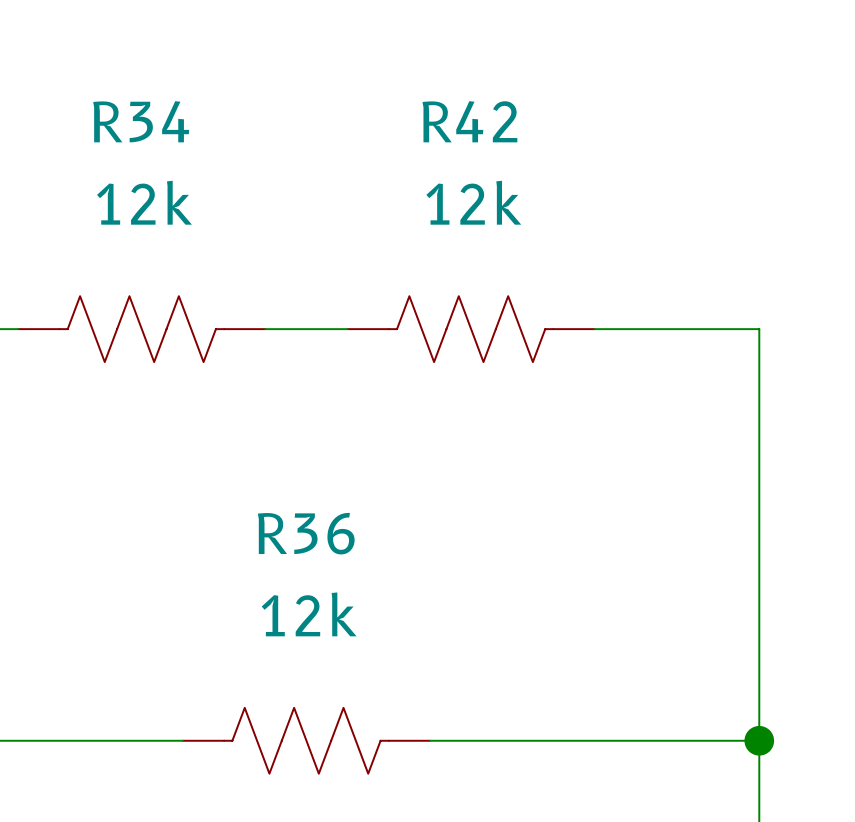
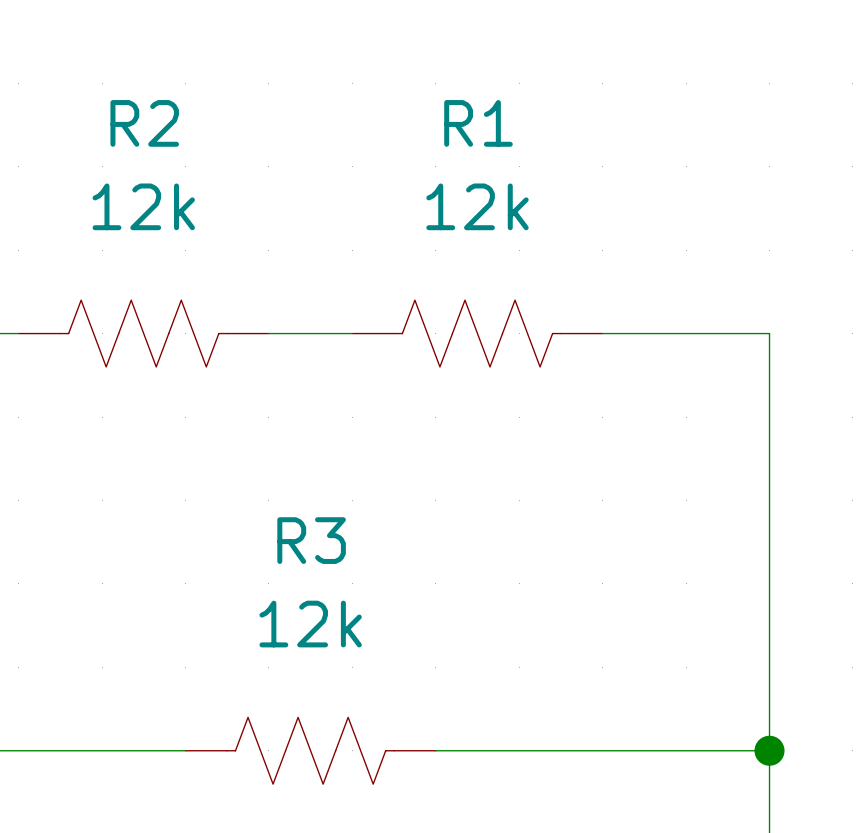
R34 name: R34 (141, 121) -> R2 (144, 123)
R42 name: R42 (469, 121) -> R1 (478, 123)
R36 name: R36 (306, 533) -> R3 (311, 540)

